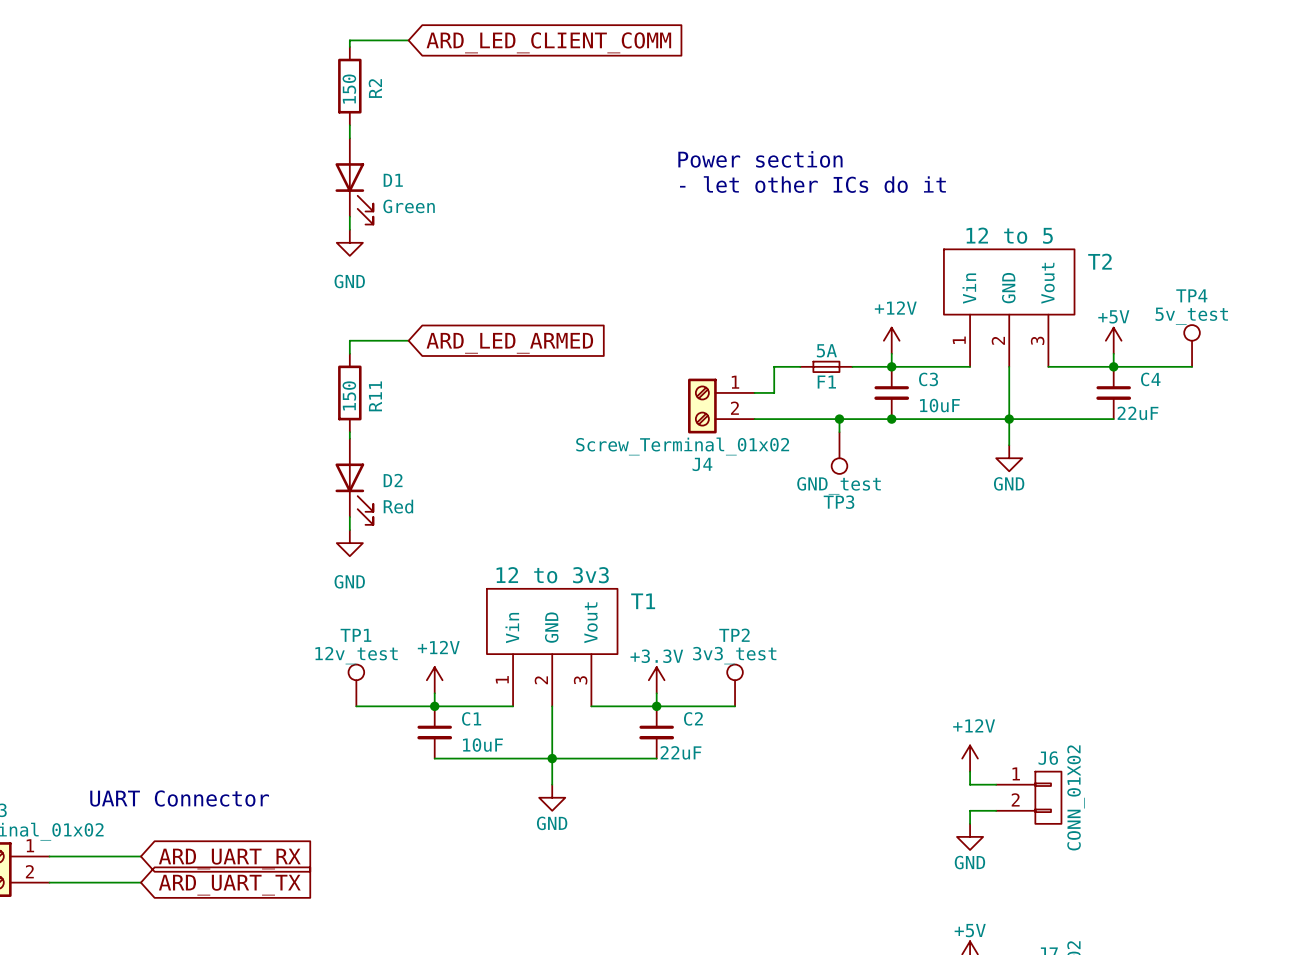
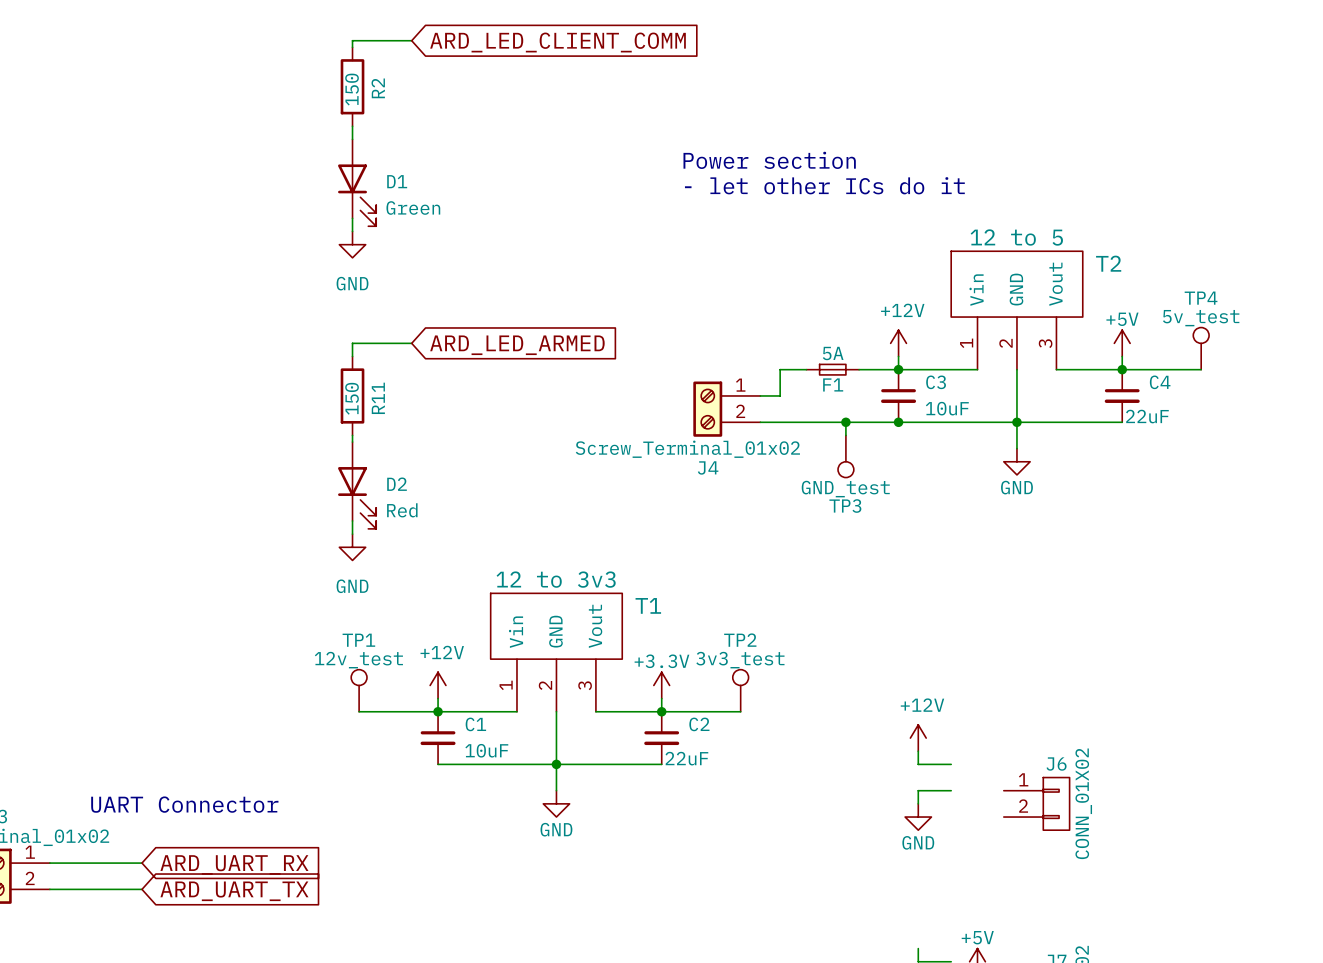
wire: none -> (918, 751) (918, 764) (951, 764)
power symbol position: +12V (970, 758) -> +12V (918, 738)
wire: (970, 771) (970, 784) (996, 784) -> none
wire: none -> (951, 790) (918, 790) (918, 803)
wire: (996, 810) (970, 810) (970, 823) -> none
power symbol position: GND (970, 836) -> GND (918, 817)
wire: none -> (918, 948) (918, 961) (951, 961)

